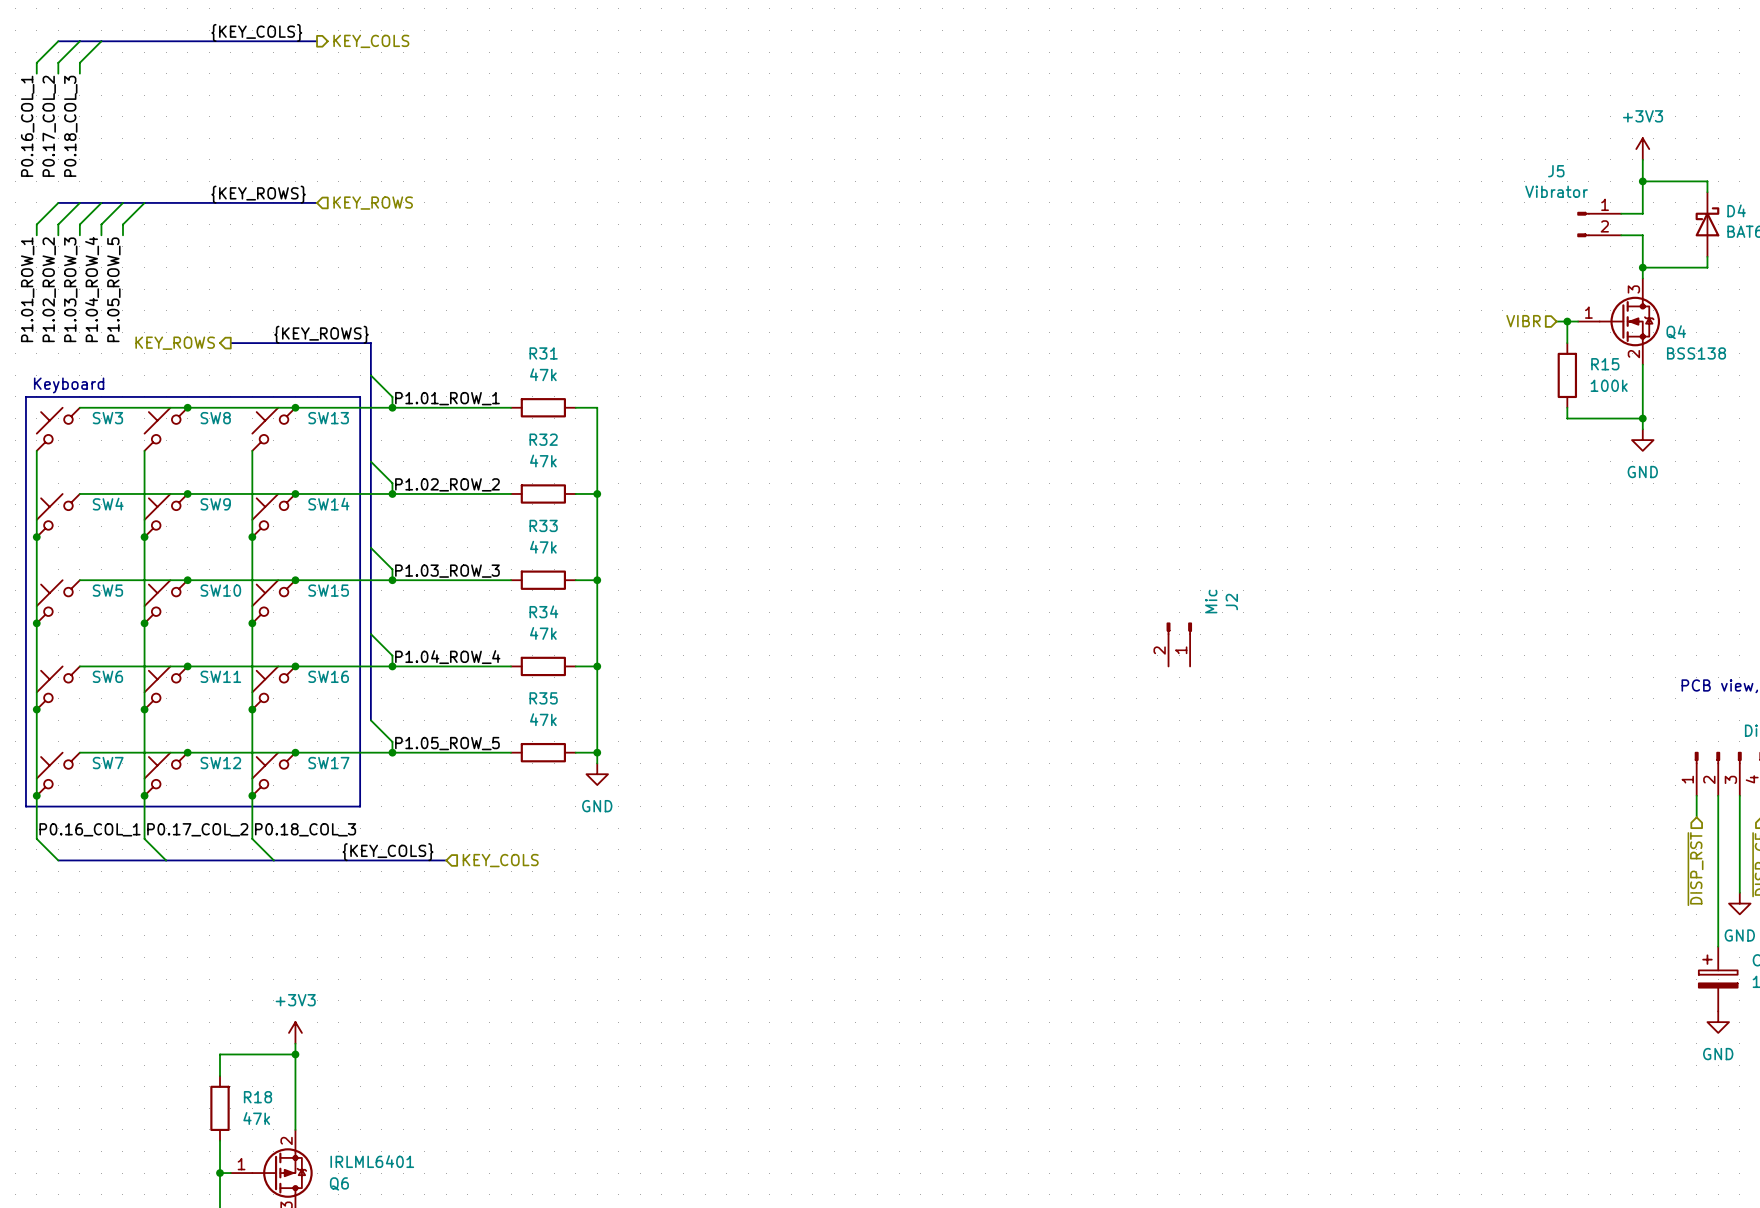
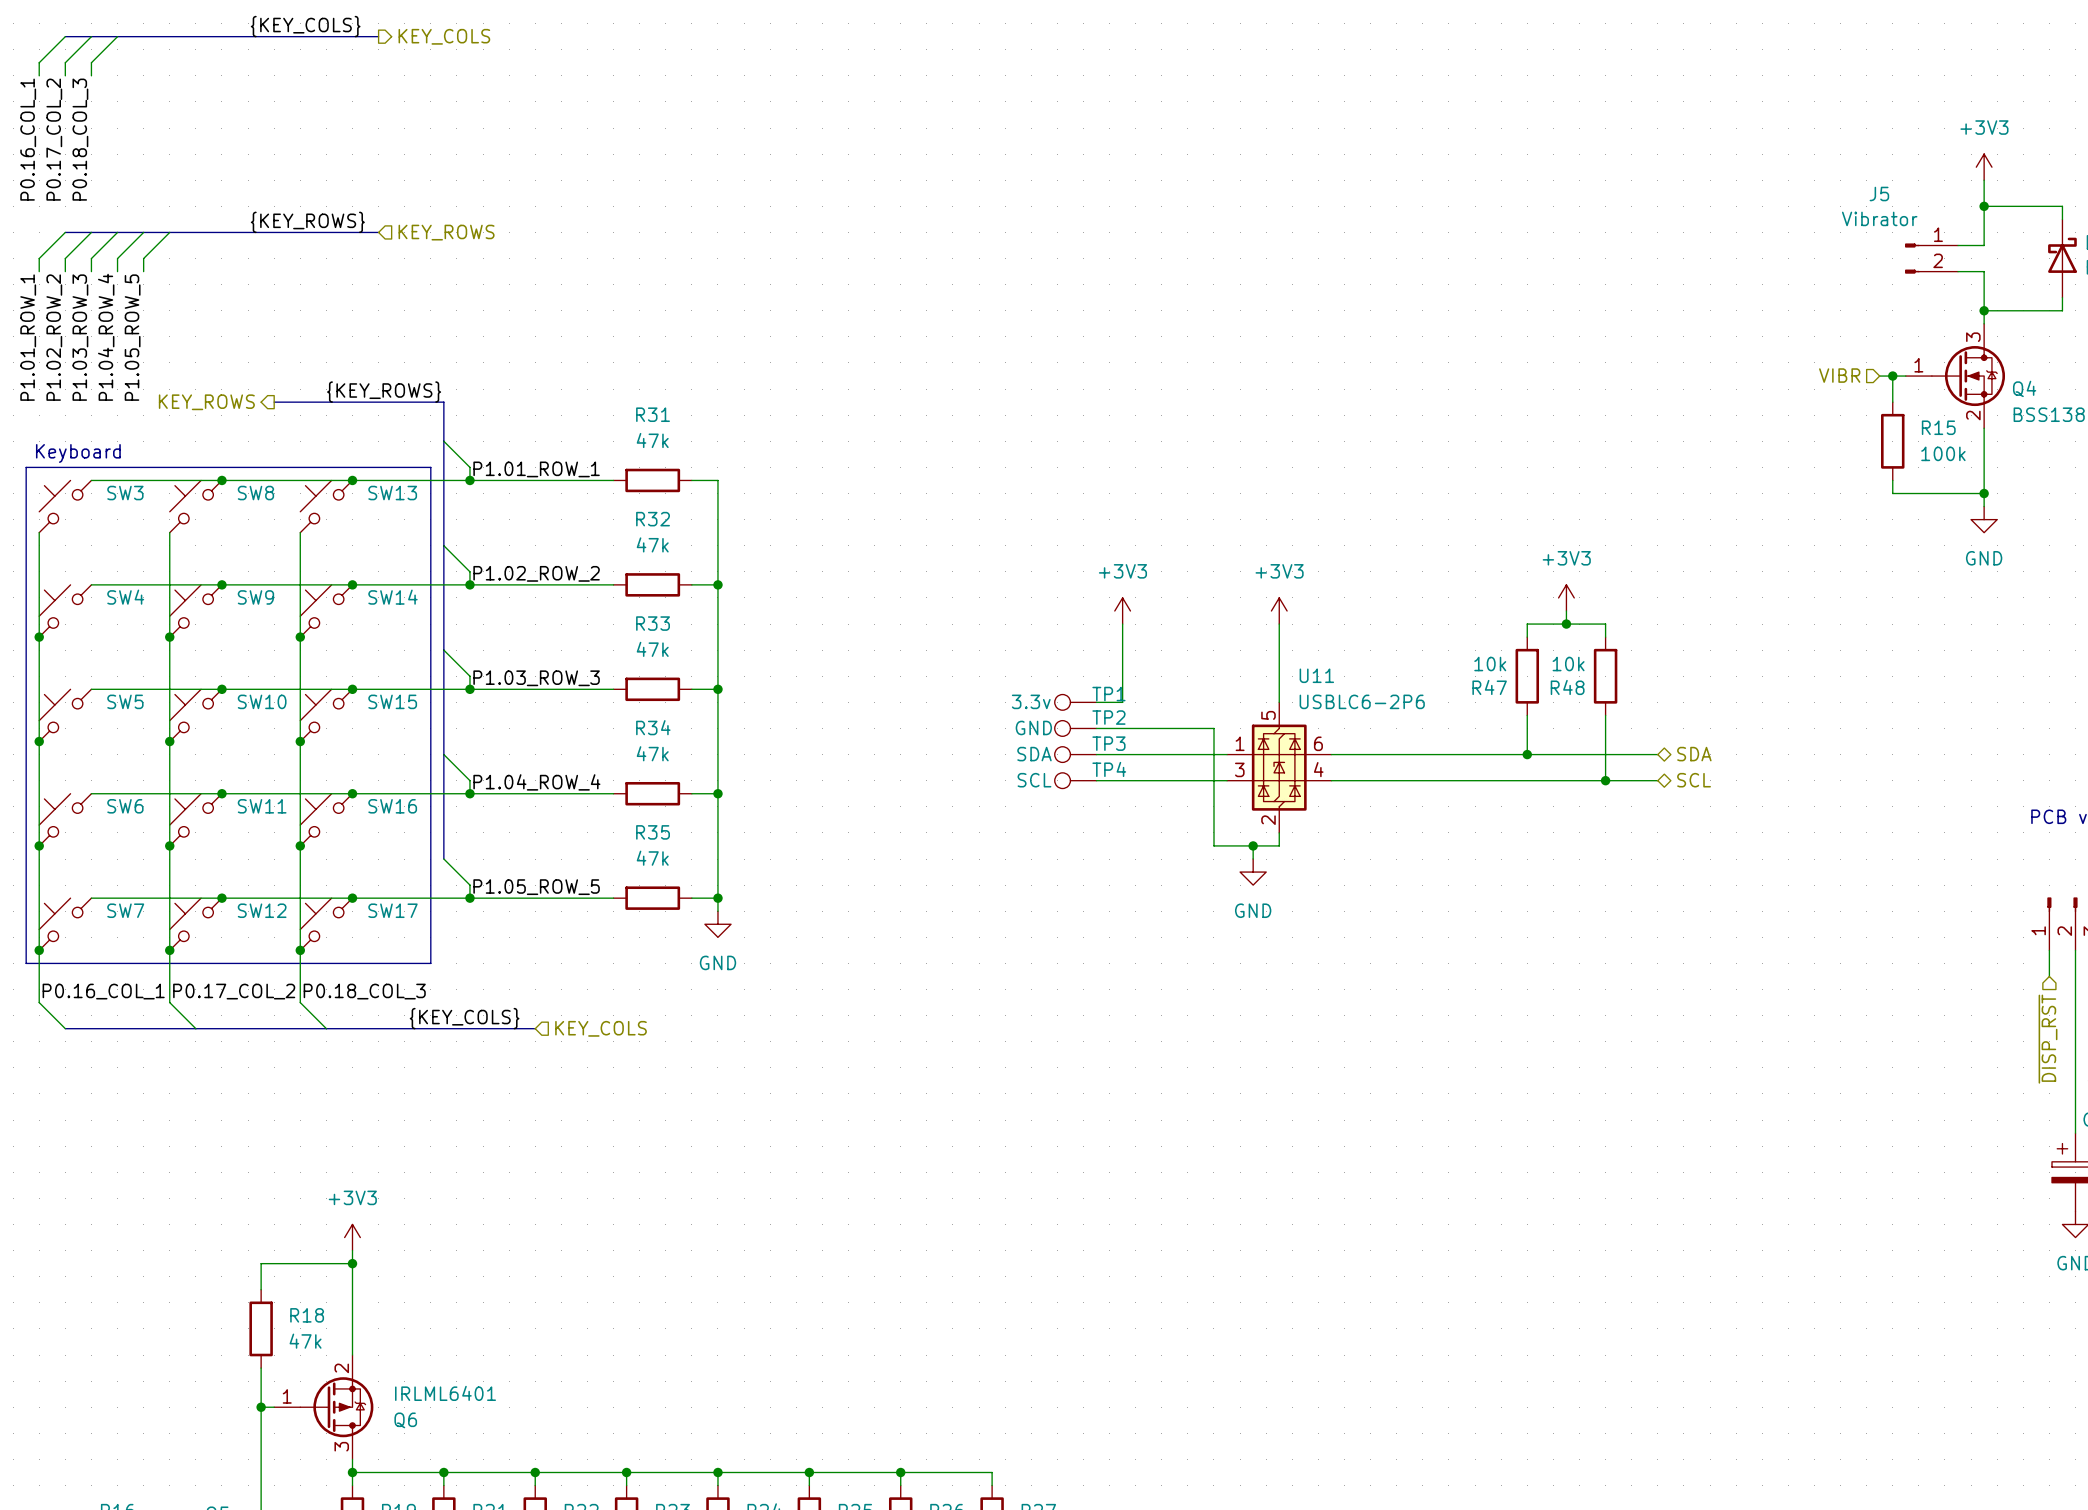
power symbol: none -> +3V3 (1566, 597)
power symbol: none -> +3V3 (1122, 610)
power symbol: none -> +3V3 (1279, 610)
wire: none -> (1566, 610) (1566, 624)
wire: none -> (1122, 624) (1122, 702) (1096, 702)
wire: none -> (1279, 624) (1279, 702)
junction: none -> (1566, 624)
wire: none -> (1527, 637) (1527, 624) (1605, 624) (1605, 637)
R47: none -> 10k (1527, 676)
R48: none -> 10k (1605, 676)
TP1: none -> 3.3v (1075, 702)
wire: none -> (1527, 715) (1527, 754)
wire: none -> (1605, 715) (1605, 780)
TP2: none -> GND (1075, 728)
wire: none -> (1096, 728) (1213, 728) (1213, 845) (1279, 845) (1279, 832)
hierarchical label: none -> SDA (1694, 754)
TP3: none -> SDA (1075, 754)
wire: none -> (1096, 754) (1227, 754)
wire: none -> (1331, 754) (1657, 754)
junction: none -> (1527, 754)
U11: none -> USBLC6-2P6 (1279, 767)
J2: Mic (1179, 644) -> none
TP4: none -> SCL (1075, 780)
wire: none -> (1096, 780) (1227, 780)
wire: none -> (1331, 780) (1657, 780)
junction: none -> (1605, 780)
hierarchical label: none -> SCL (1694, 780)
wire: none -> (1253, 845) (1253, 859)
junction: none -> (1253, 845)
power symbol: none -> GND (1253, 872)

